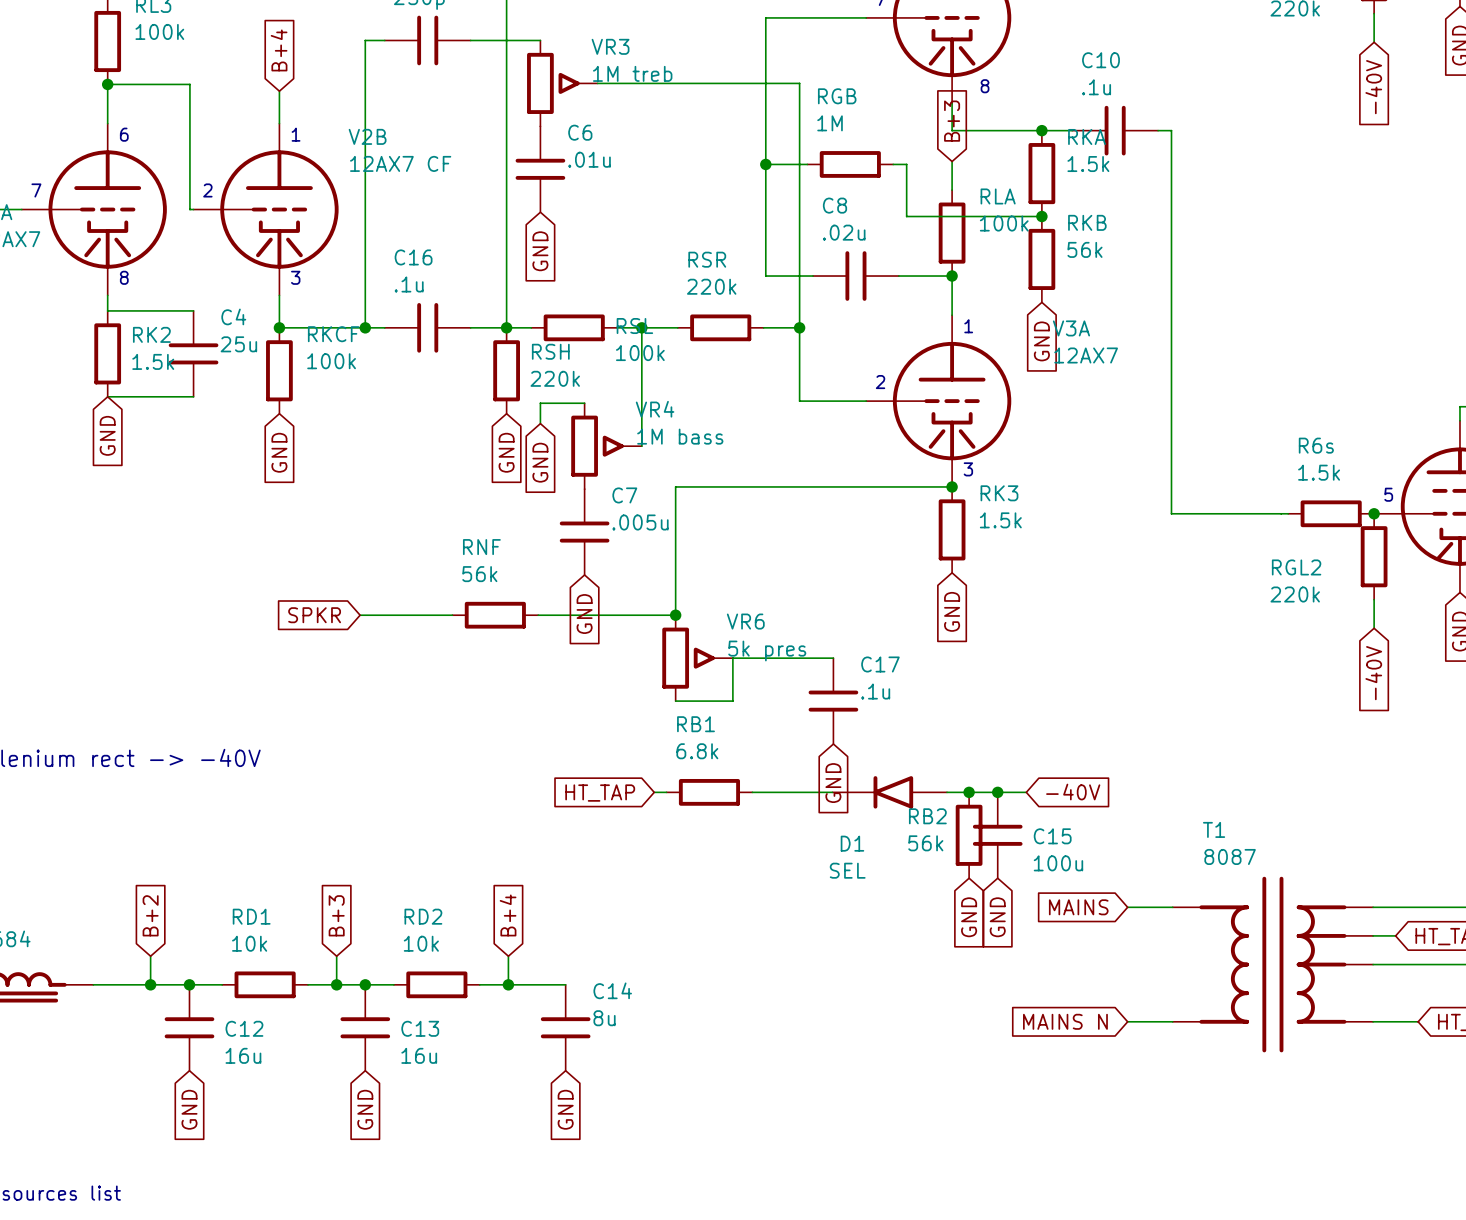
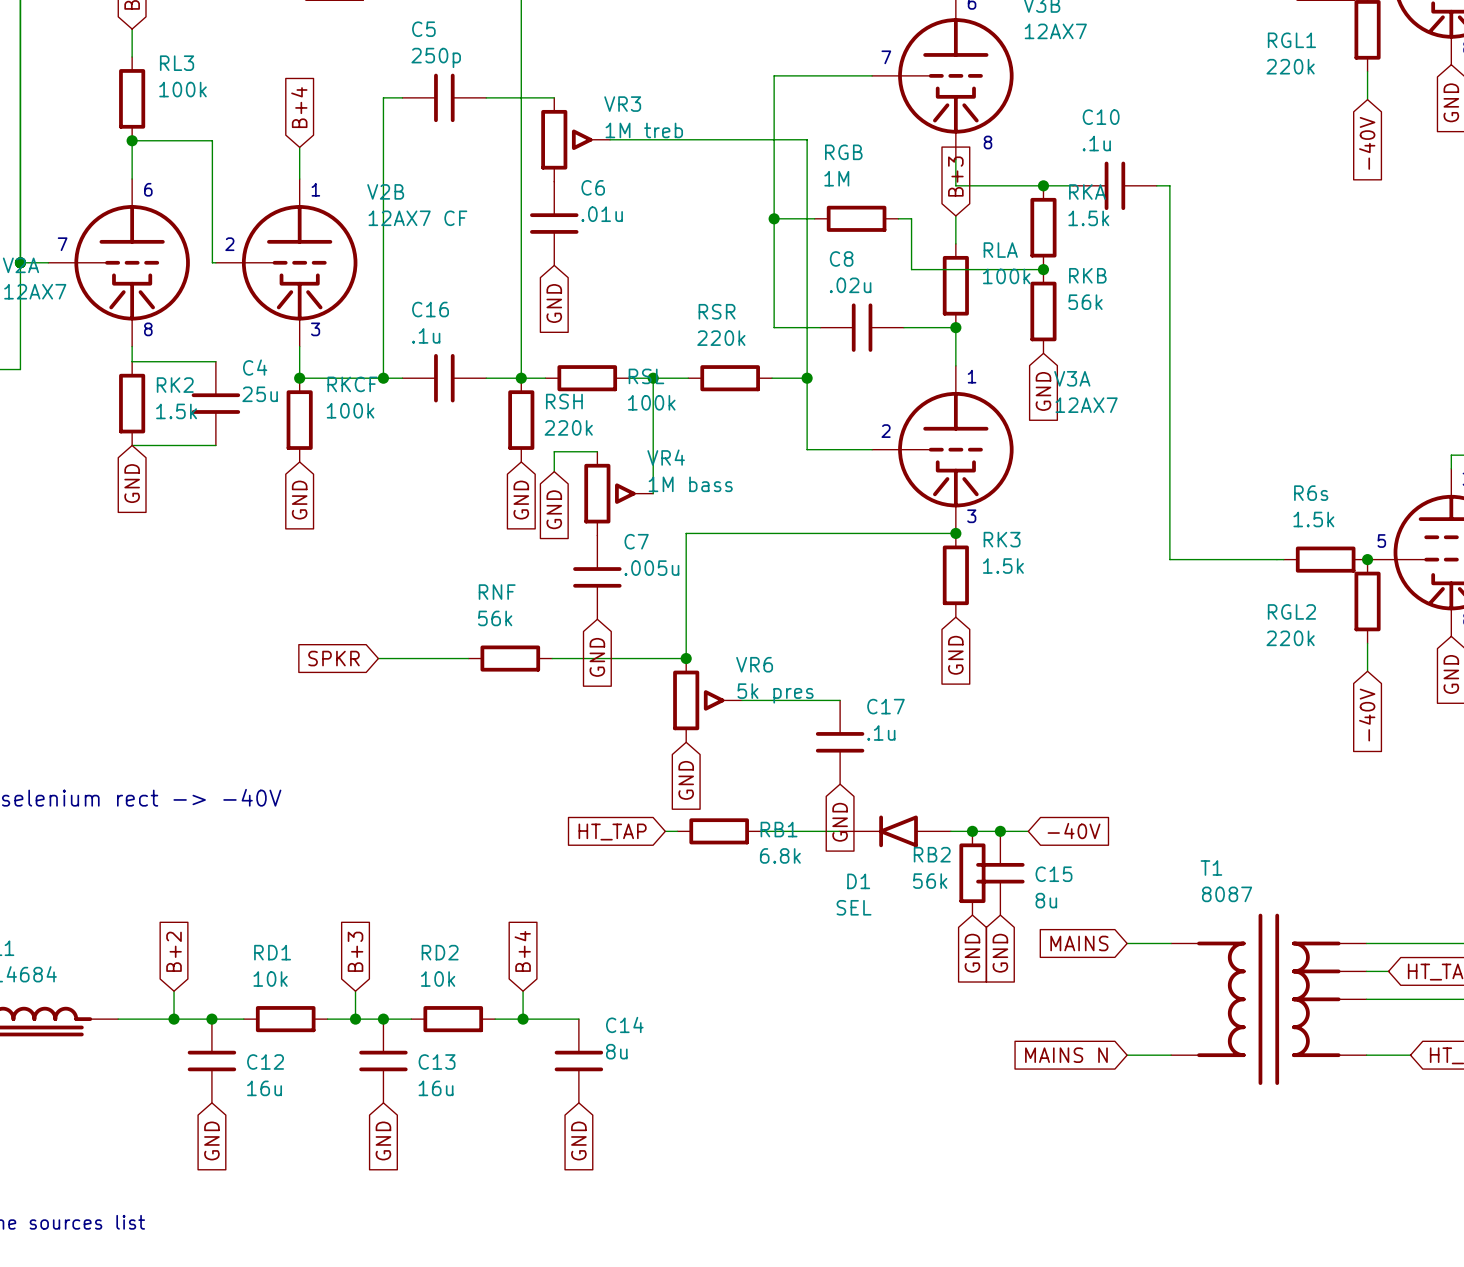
wire: (732, 658) (732, 701) (675, 701) -> none
RB1 name position: RB1 (695, 724) -> RB1 (779, 829)
global label: none -> GND (686, 780)
RB1 value position: 6.8k (697, 751) -> 6.8k (780, 855)
C15 value: 100u (1058, 863) -> 8u (1046, 900)

